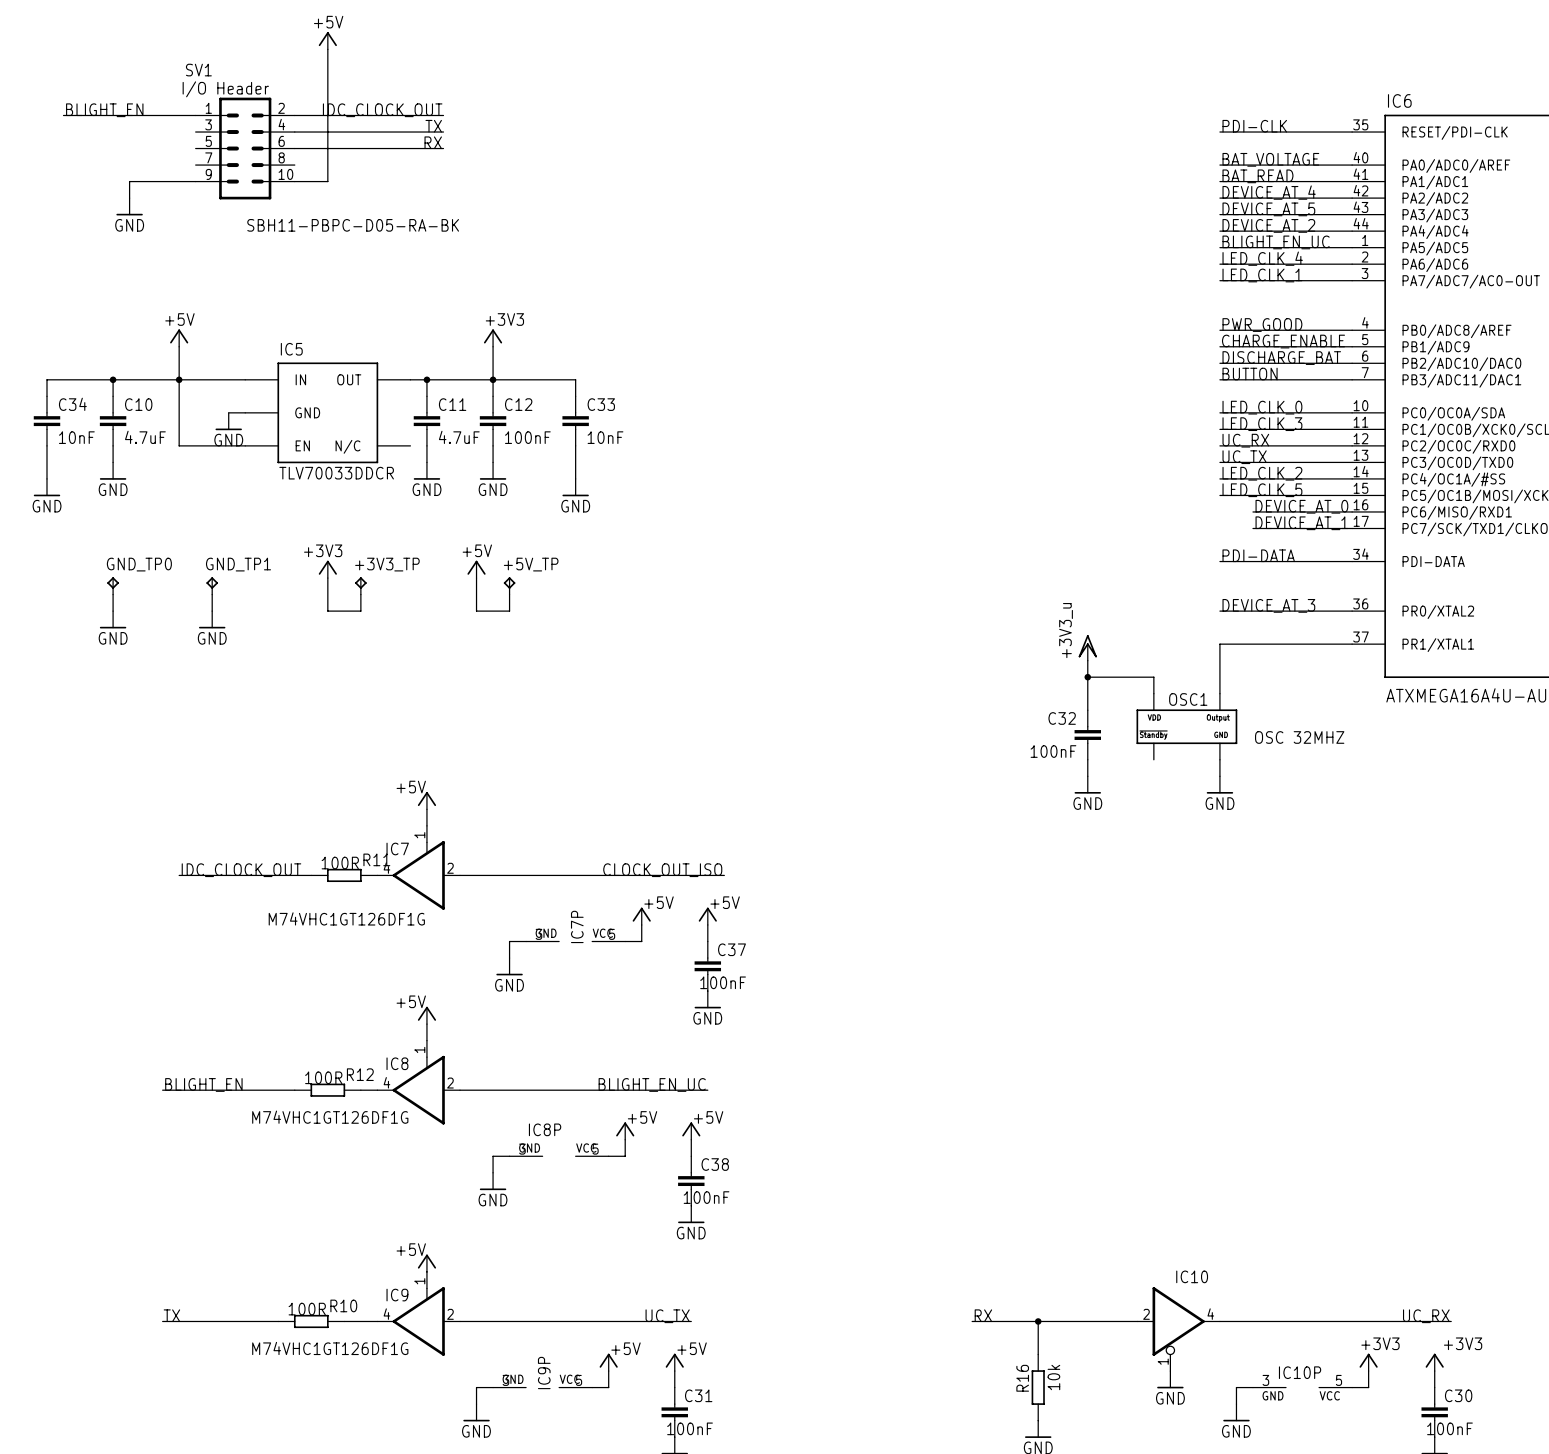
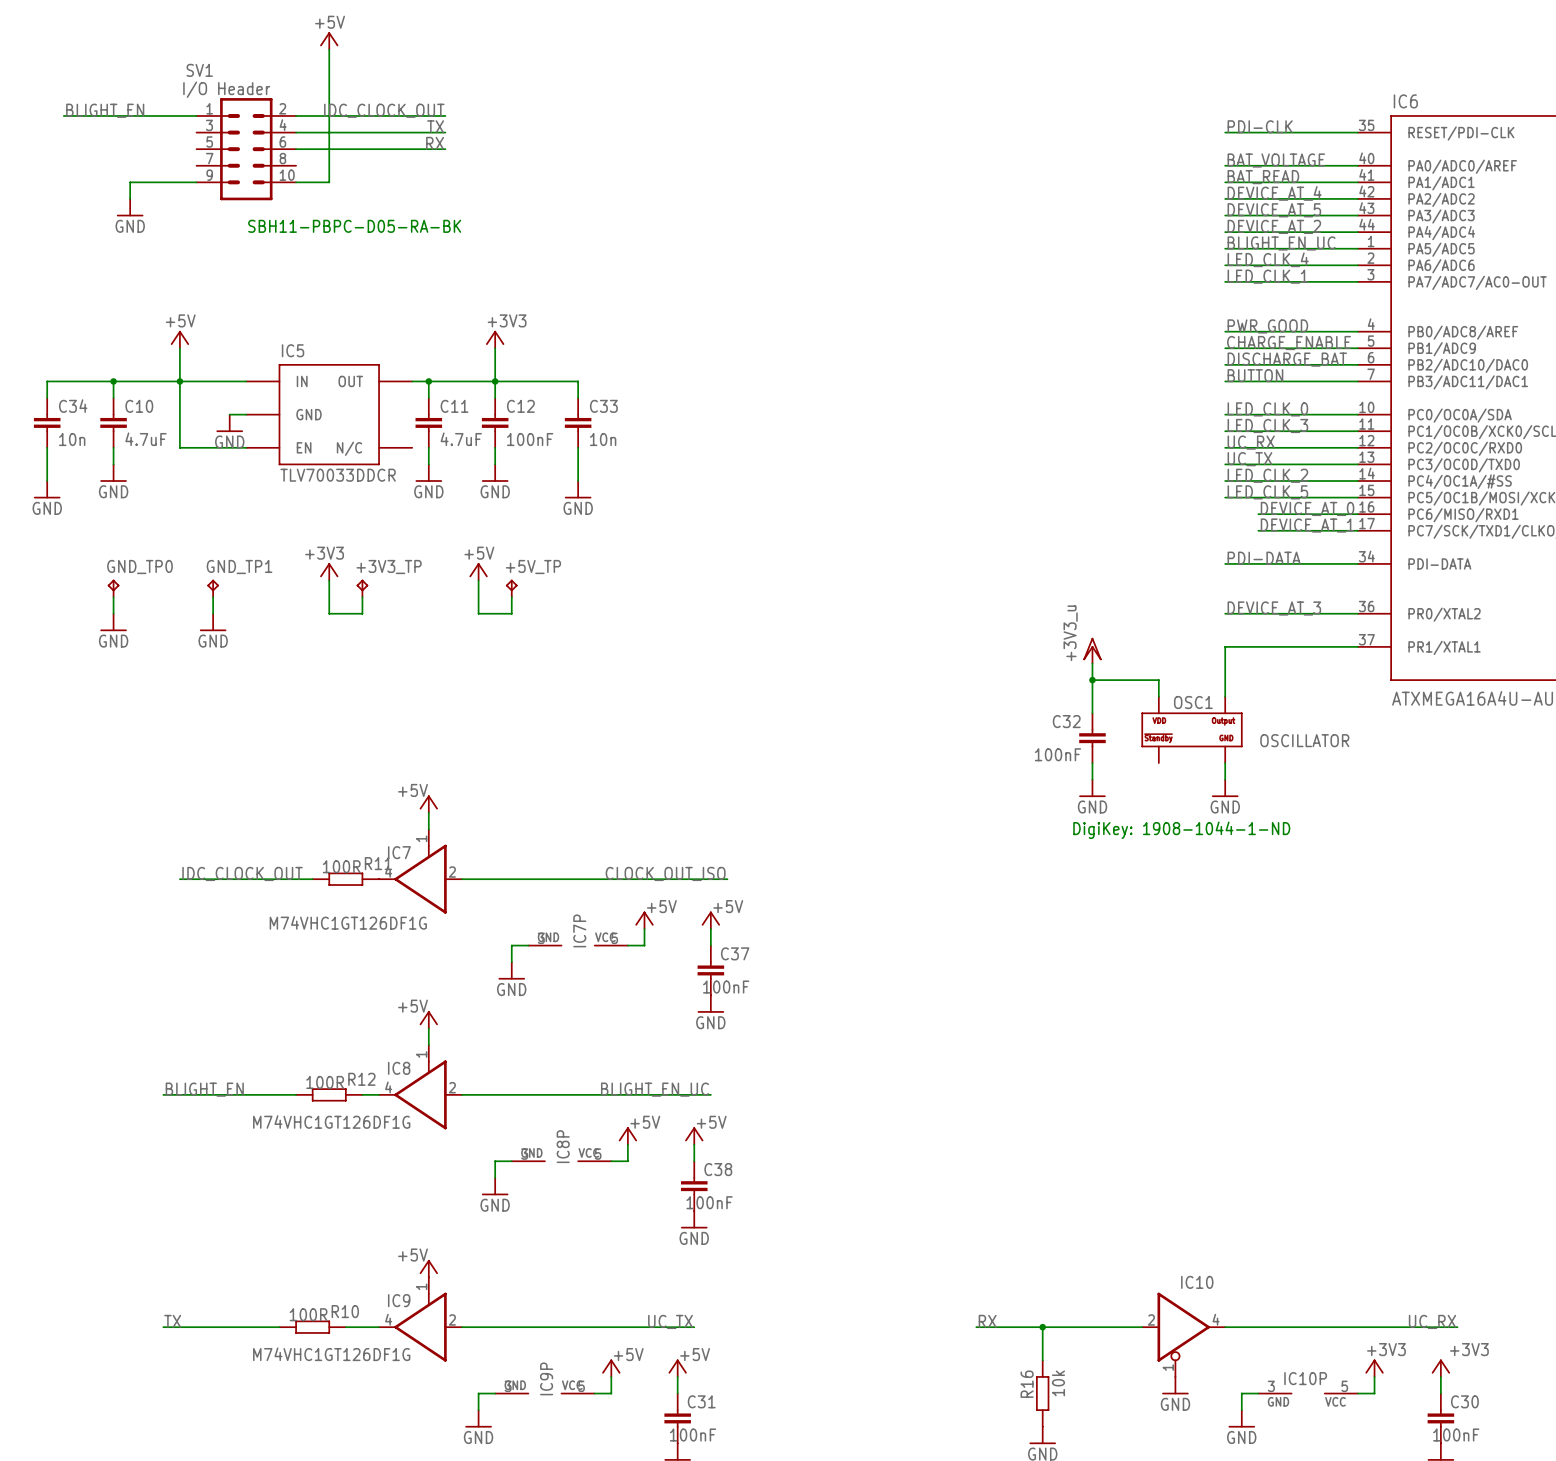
C34 value: 10nF (76, 437) -> 10n (72, 439)
C33 value: 10nF (605, 437) -> 10n (603, 439)
OSC1 value: OSC 32MHZ (1299, 737) -> OSCILLATOR (1304, 740)
text: none -> DigiKey: 1908-1044-1-ND (1181, 830)
IC8P name rotation: 0° (545, 1129) -> 90° counterclockwise (563, 1146)

